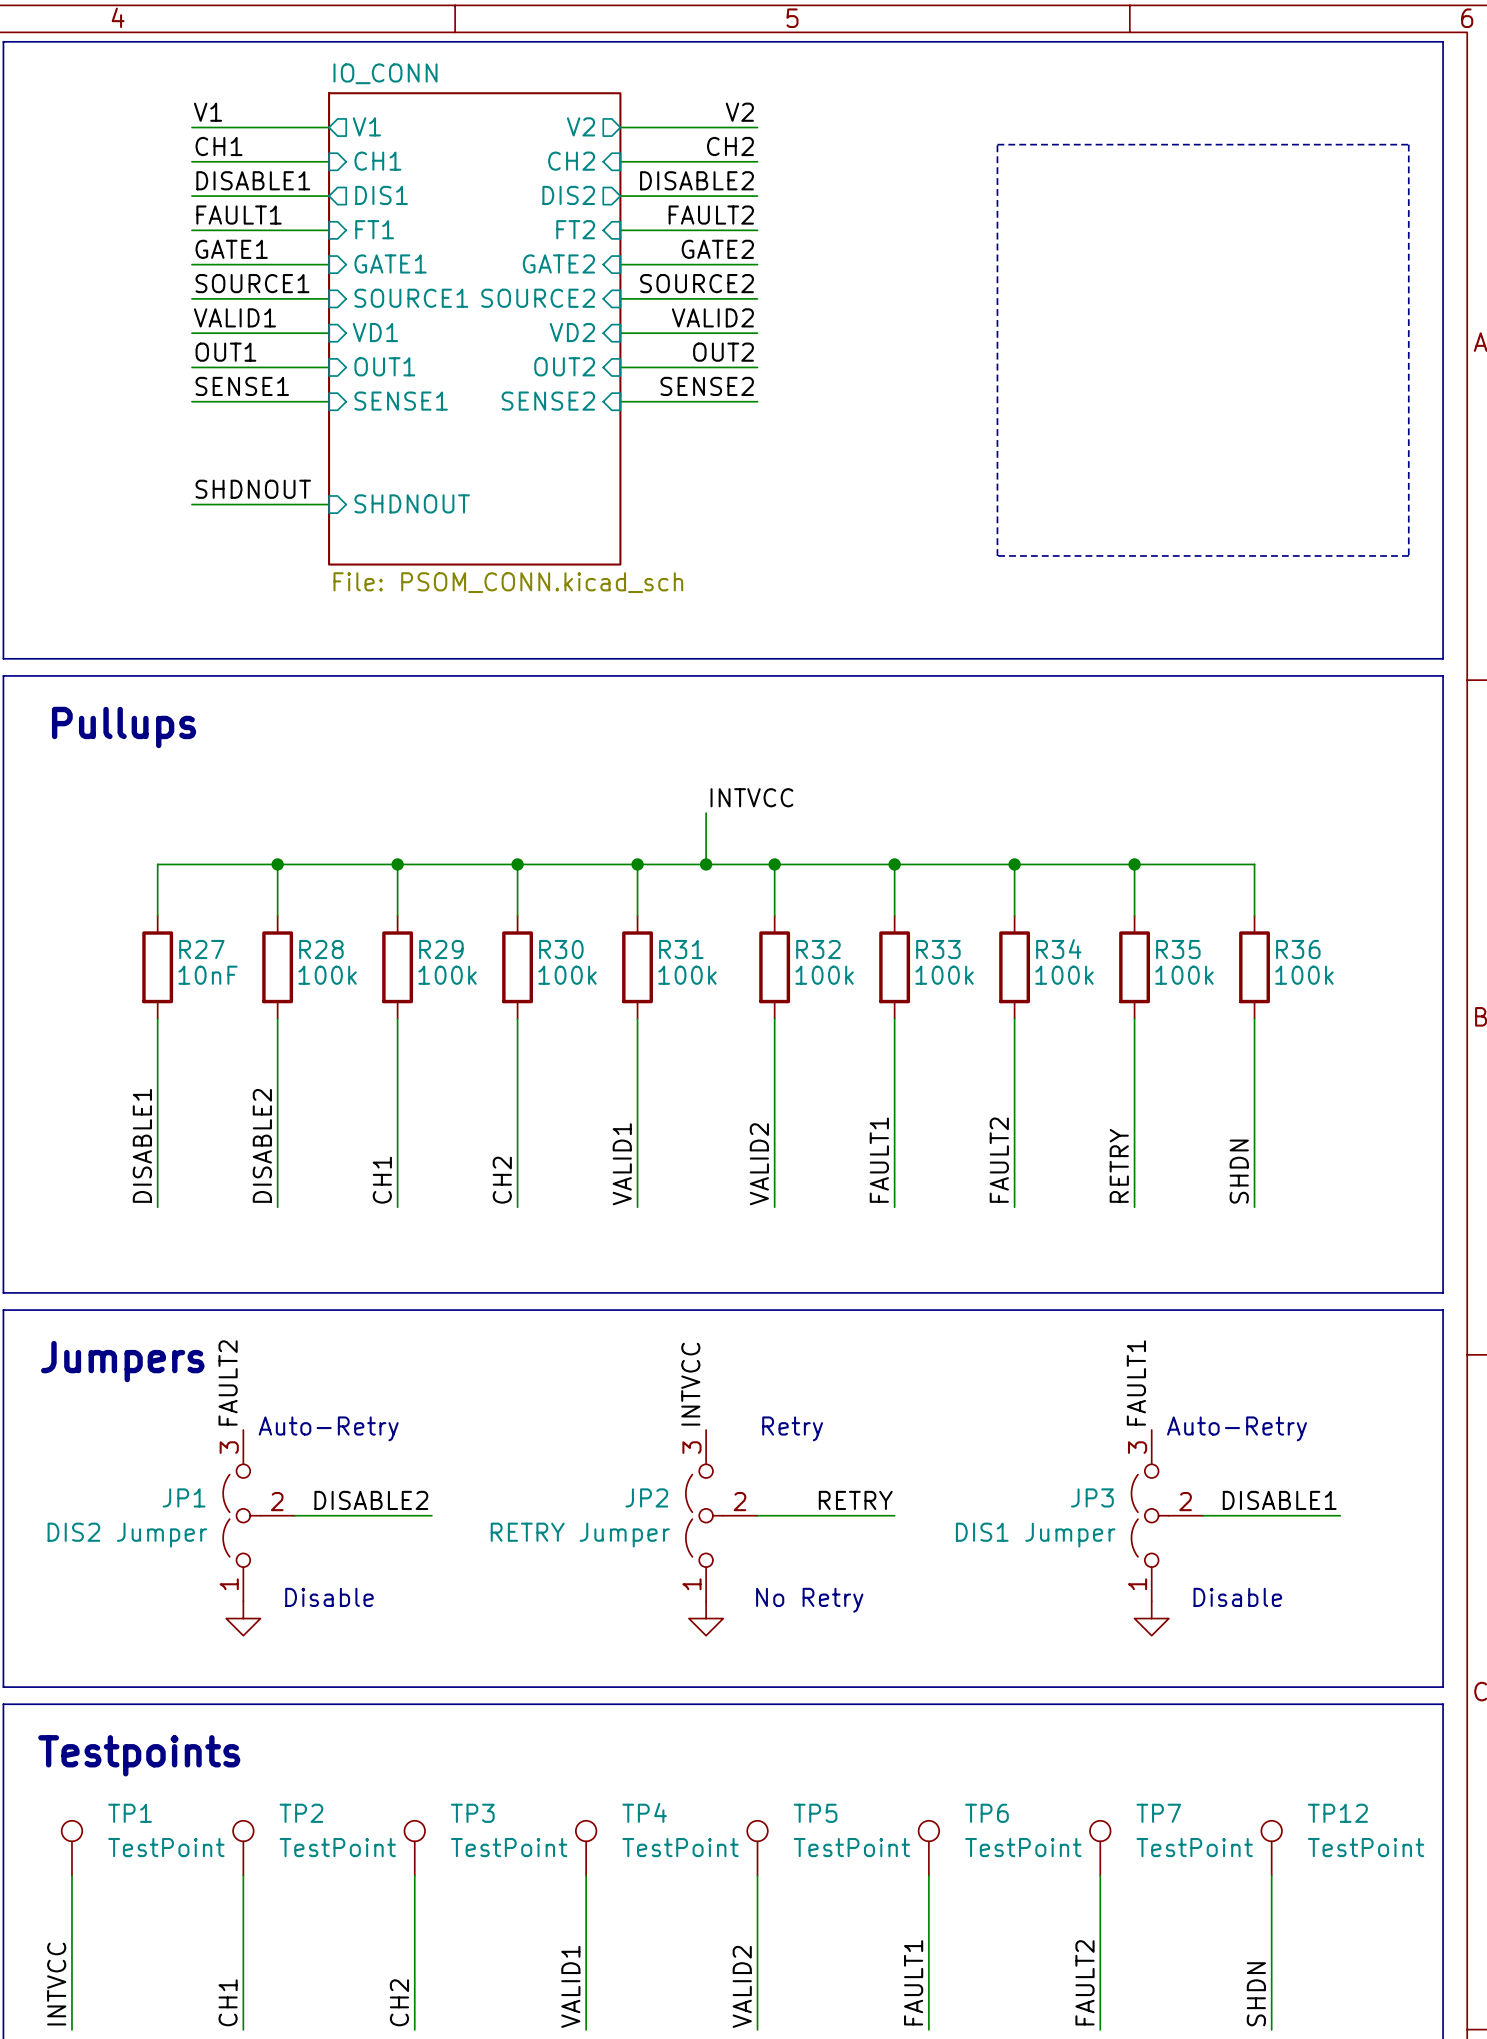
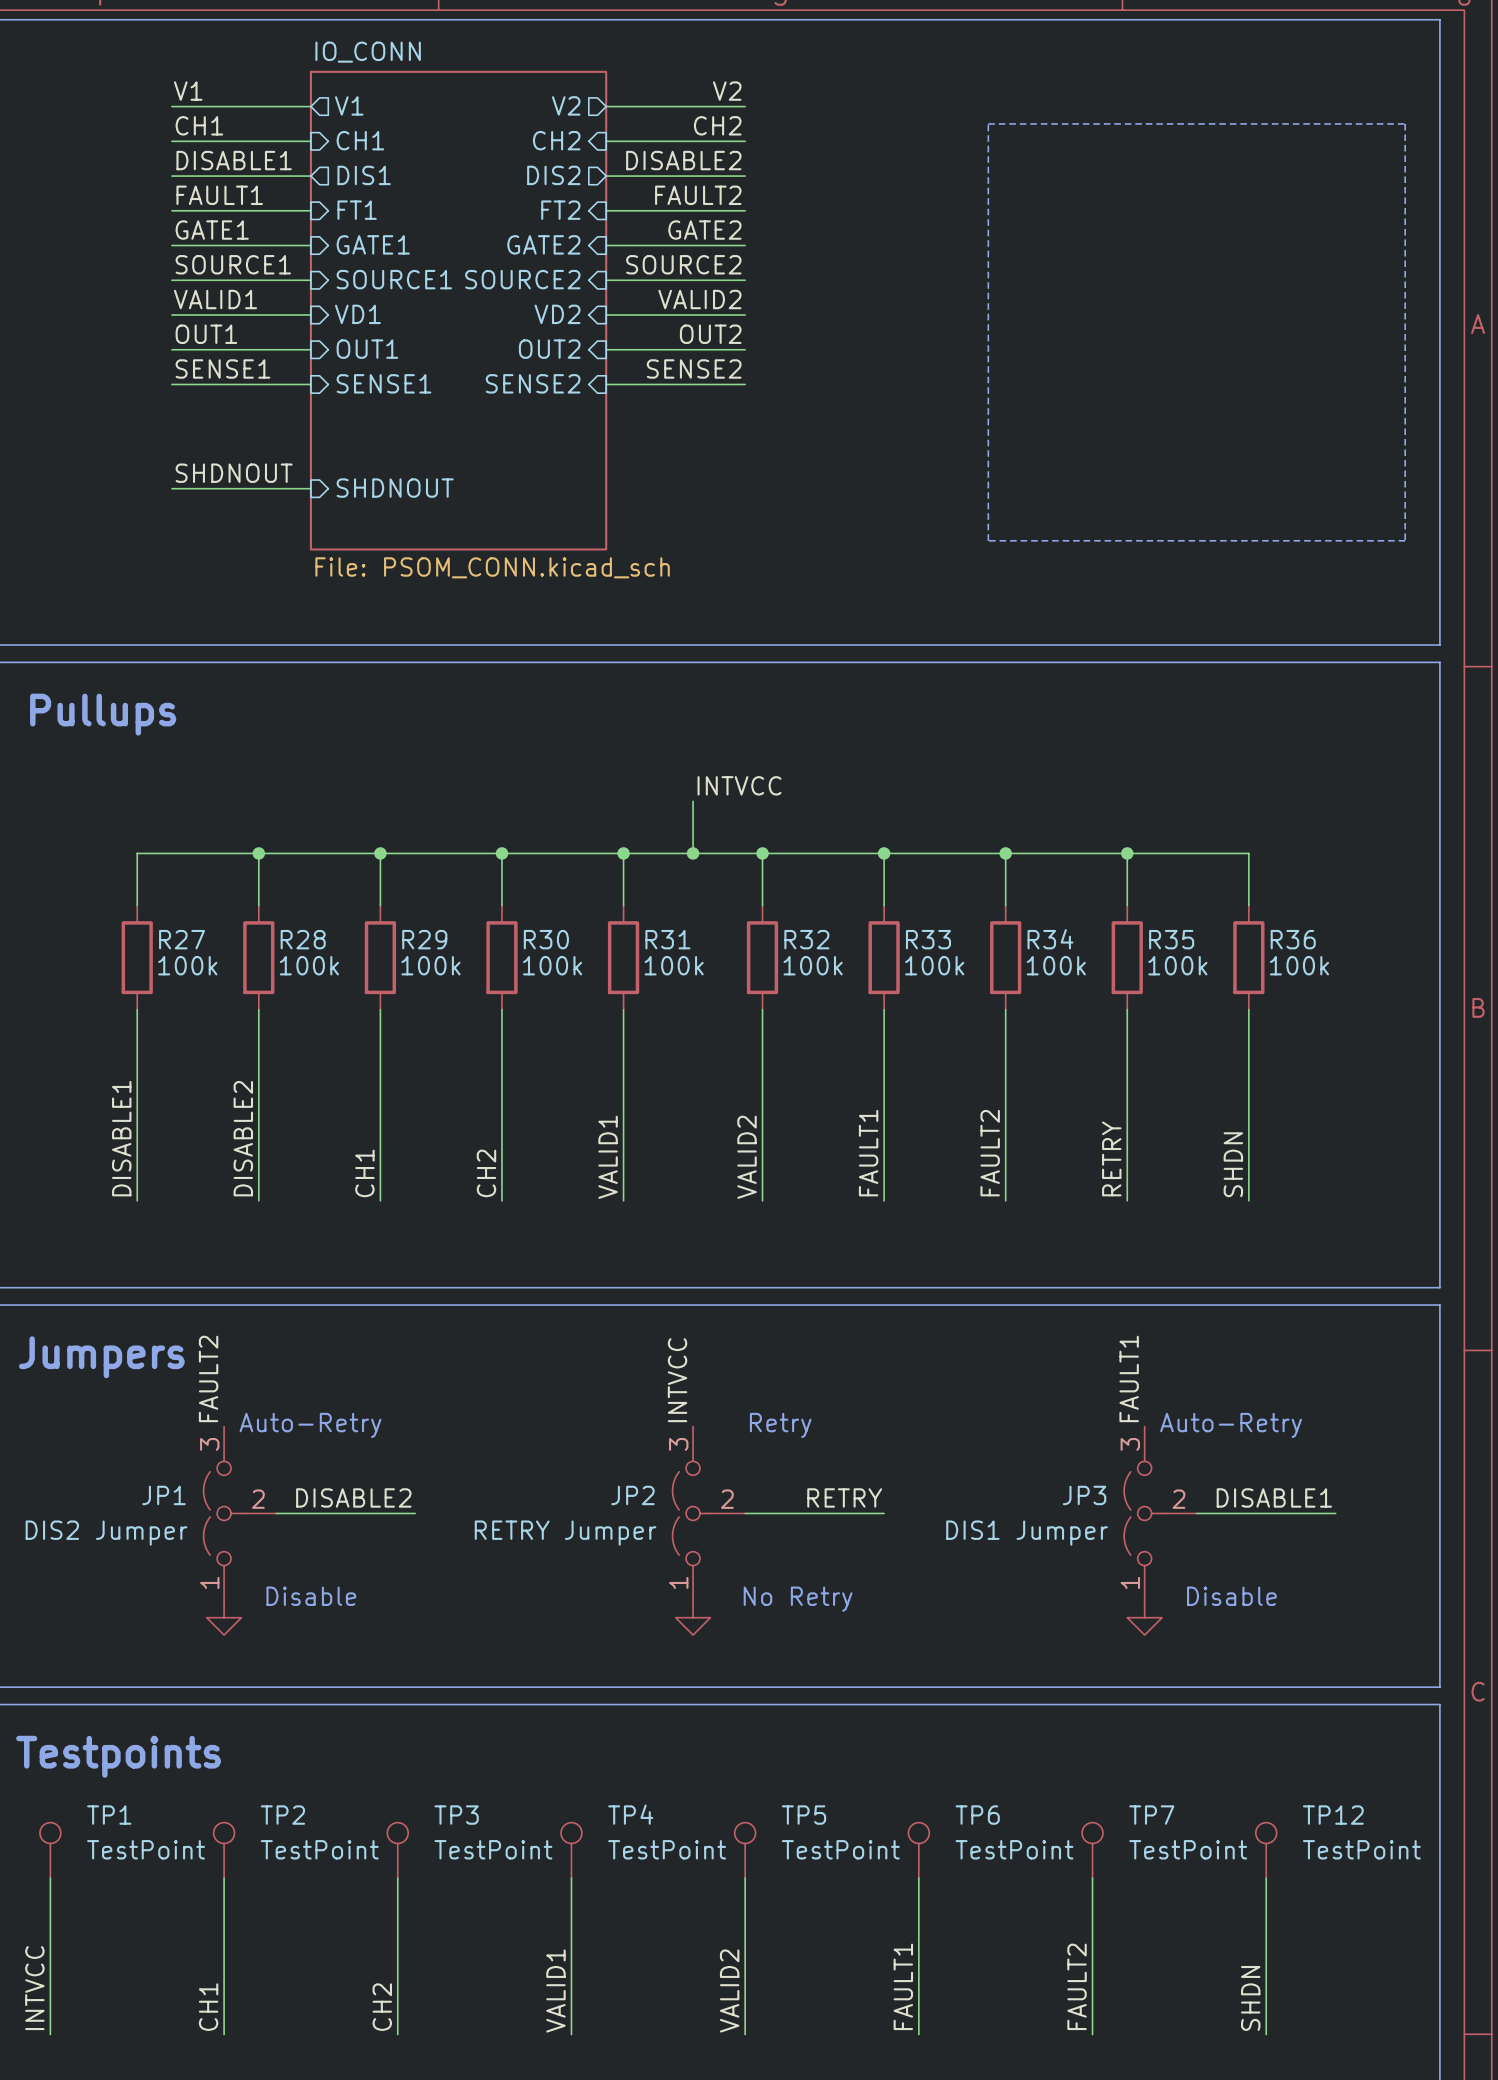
R27 value: 10nF (207, 975) -> 100k (187, 965)

